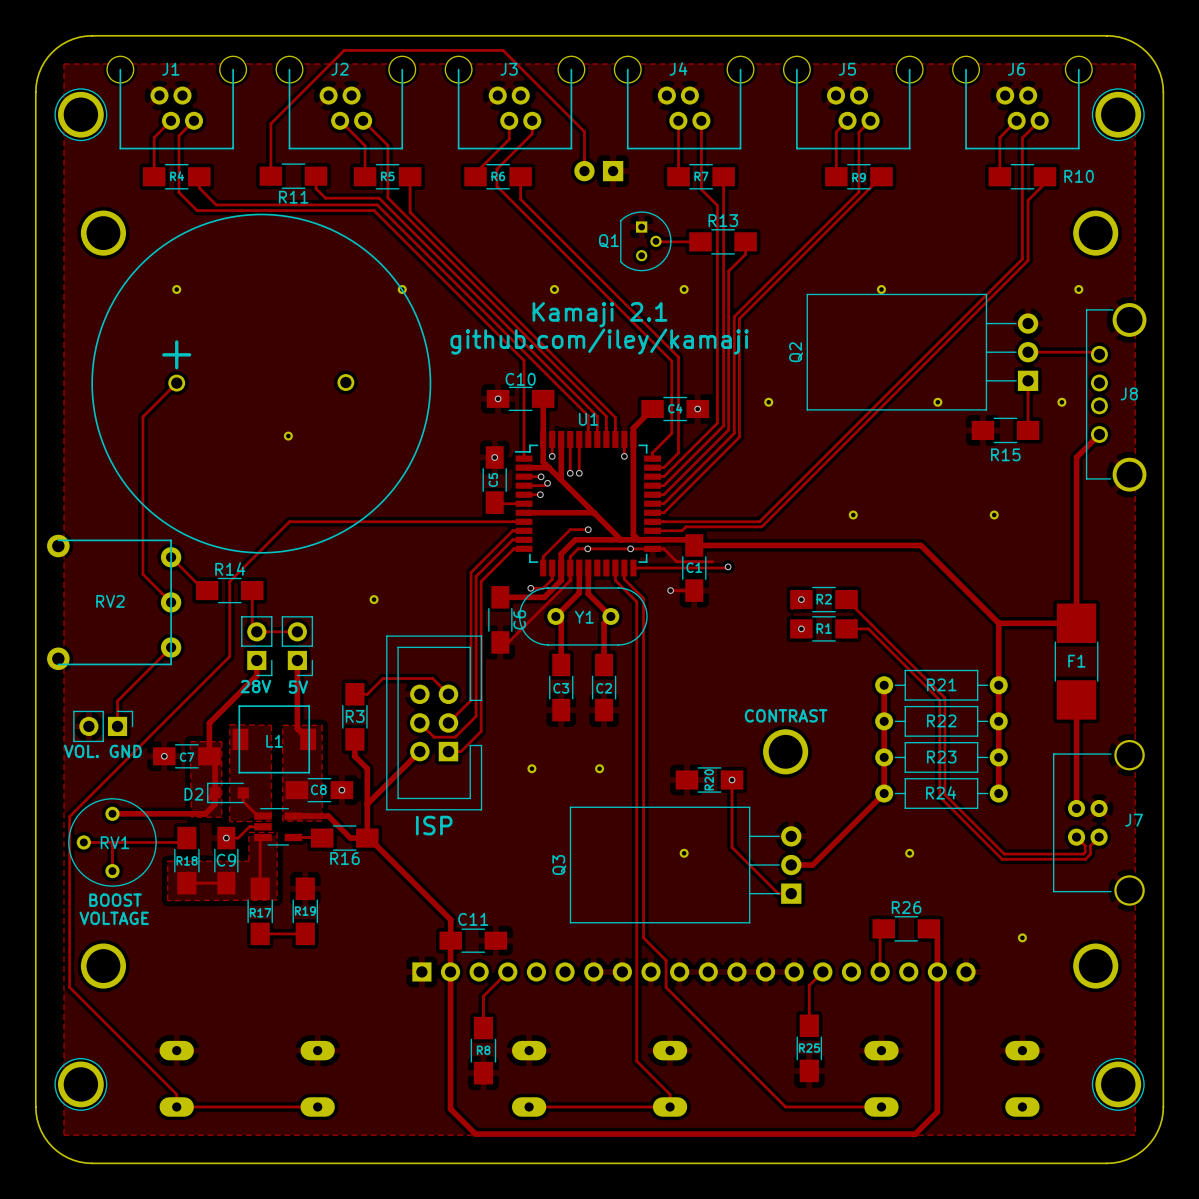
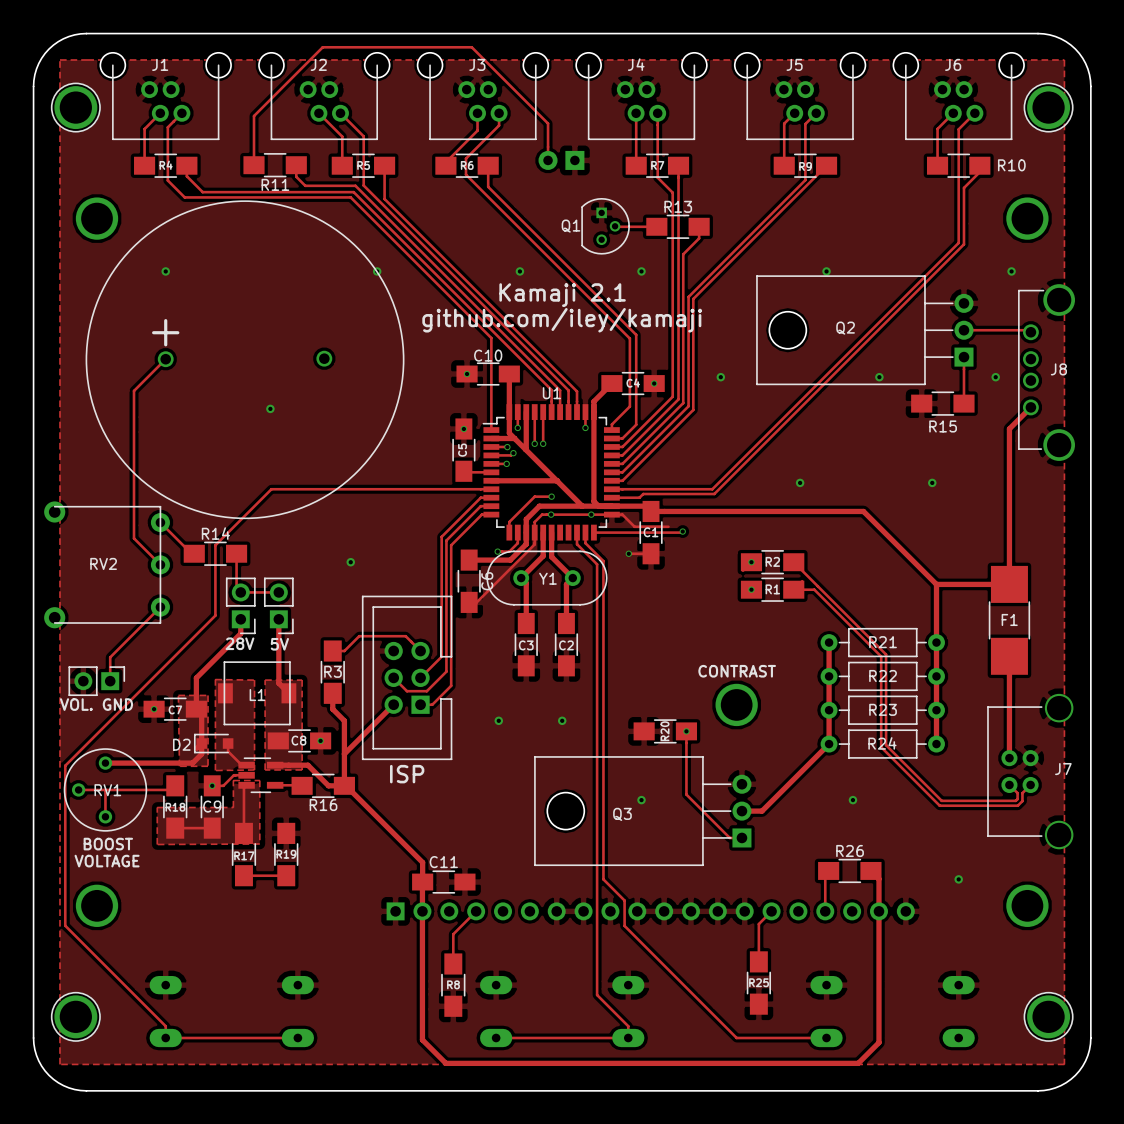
Q2 footprint: [806, 293, 1039, 411] -> [756, 275, 974, 386]
Q2 name position: Q2 (796, 352) -> Q2 (845, 328)
Q3 footprint: [569, 806, 802, 924] -> [534, 756, 752, 866]
Q3 name position: Q3 (559, 865) -> Q3 (622, 814)

